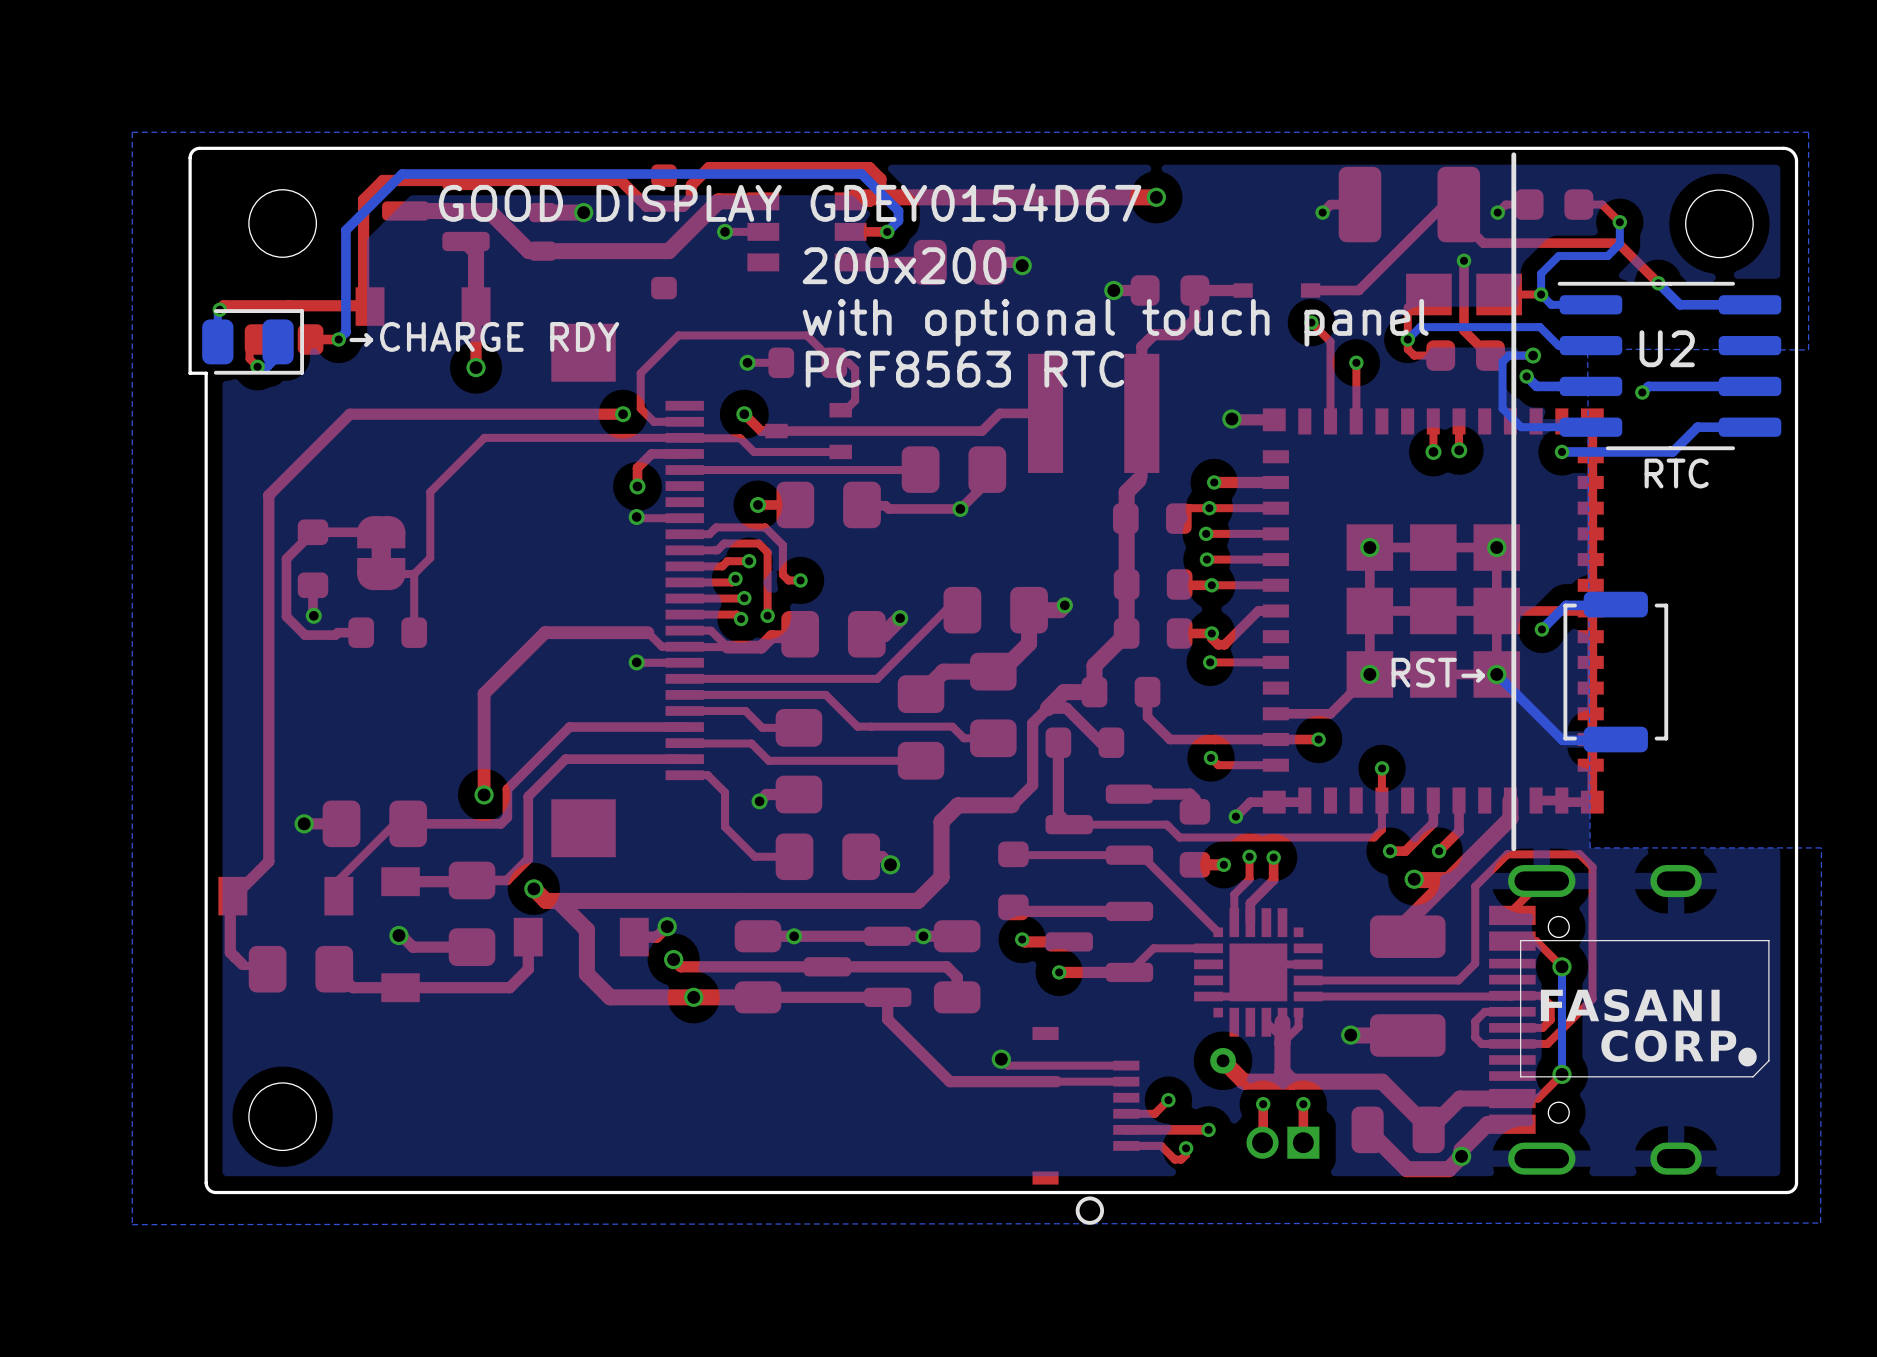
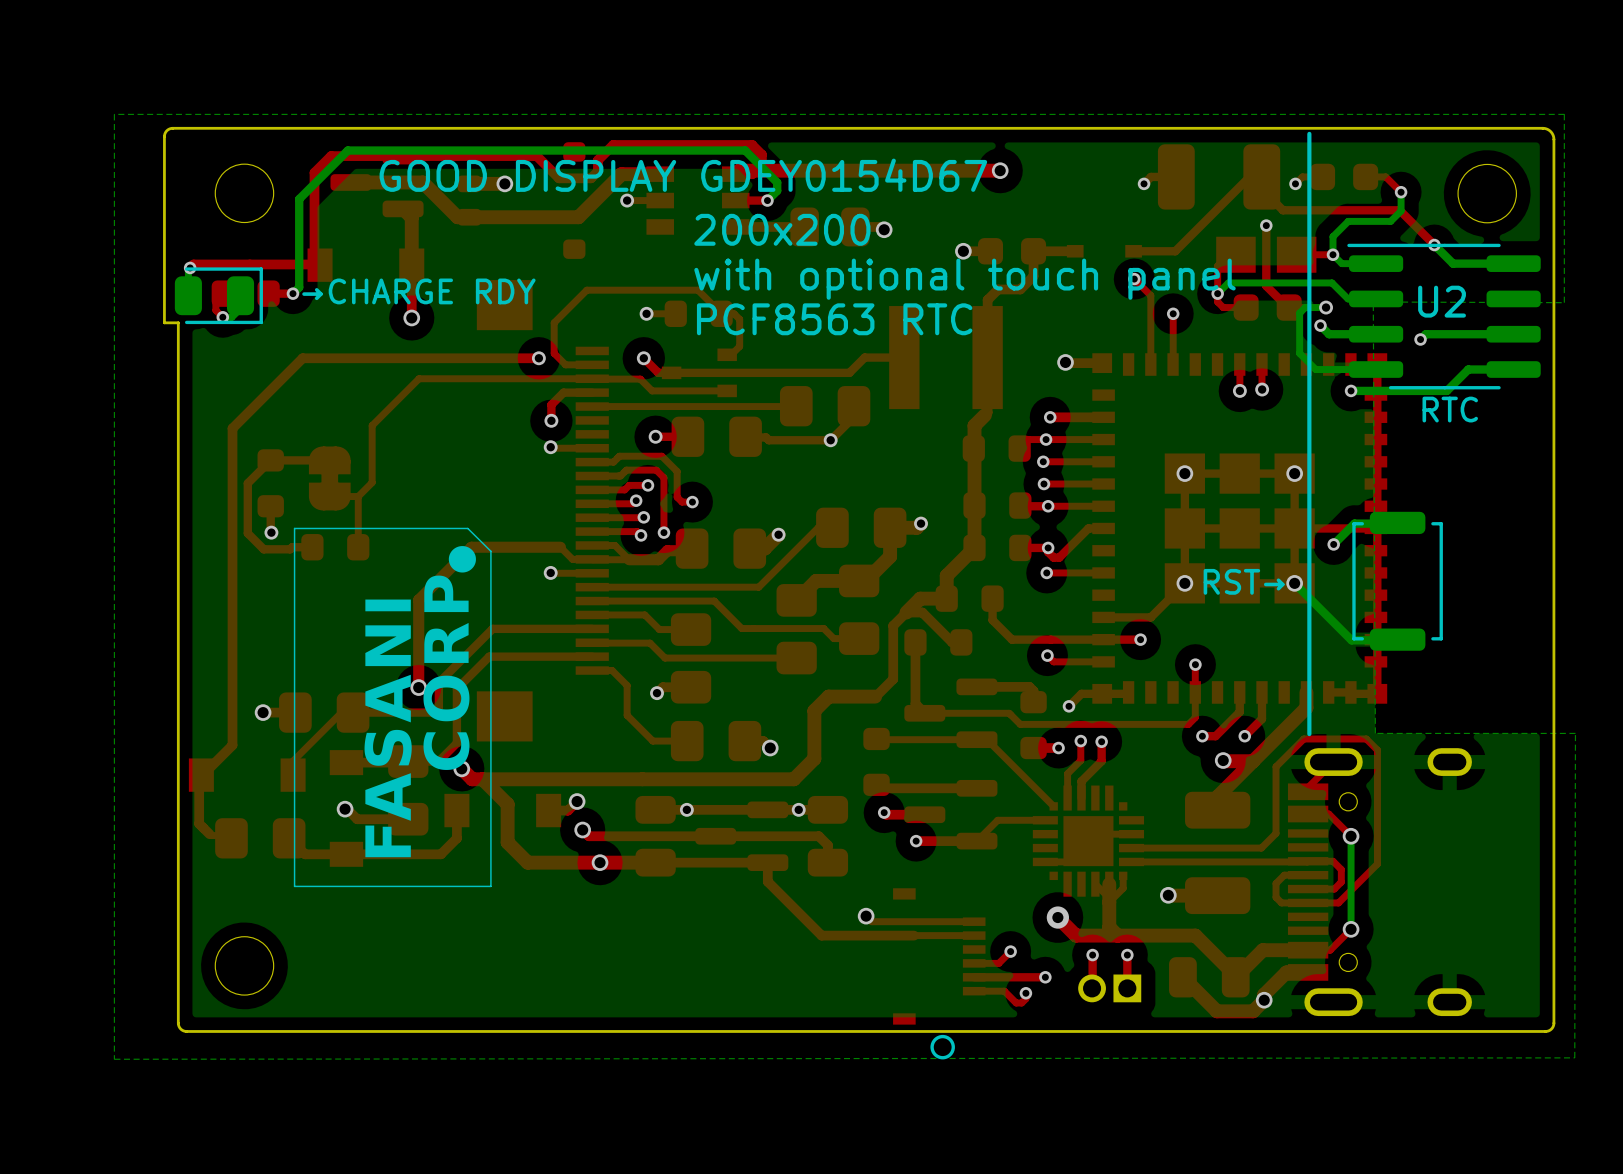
line: none -> (467, 528) (294, 528) (294, 886) (490, 886) (490, 551) (467, 528)
drawing: none -> [364, 546, 476, 858]
line: (1768, 940) (1768, 1060) (1753, 1076) (1520, 1076) (1520, 940) (1768, 940) -> none
drawing: [1540, 989, 1757, 1067] -> none

